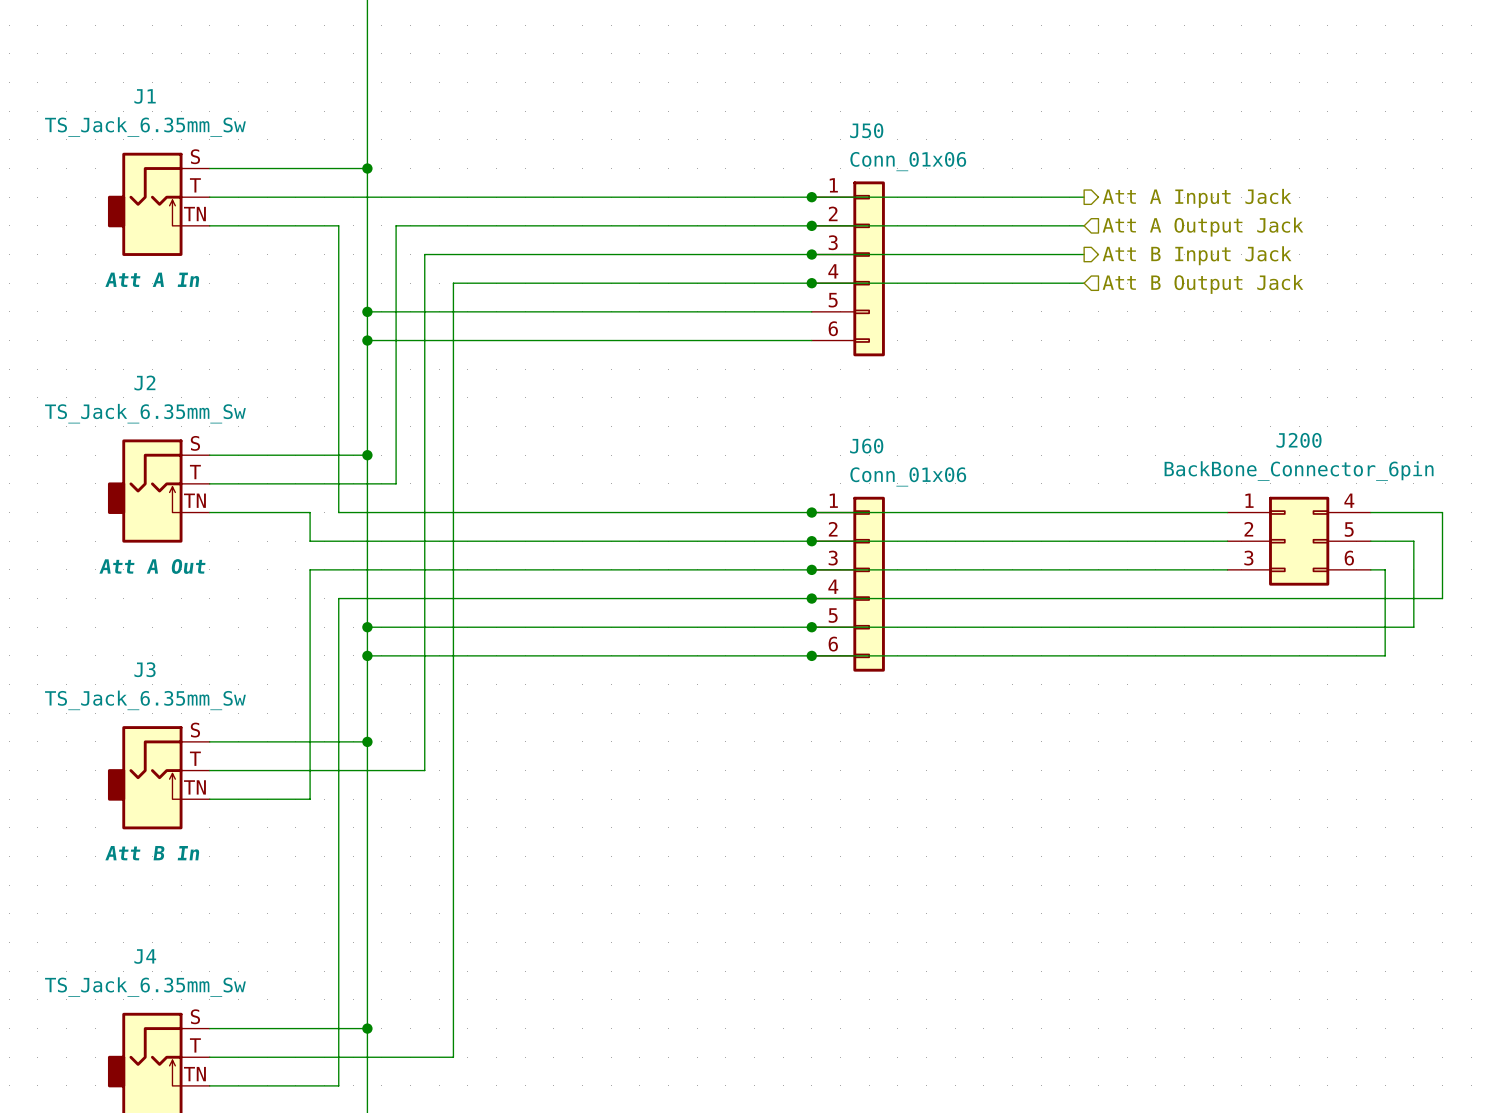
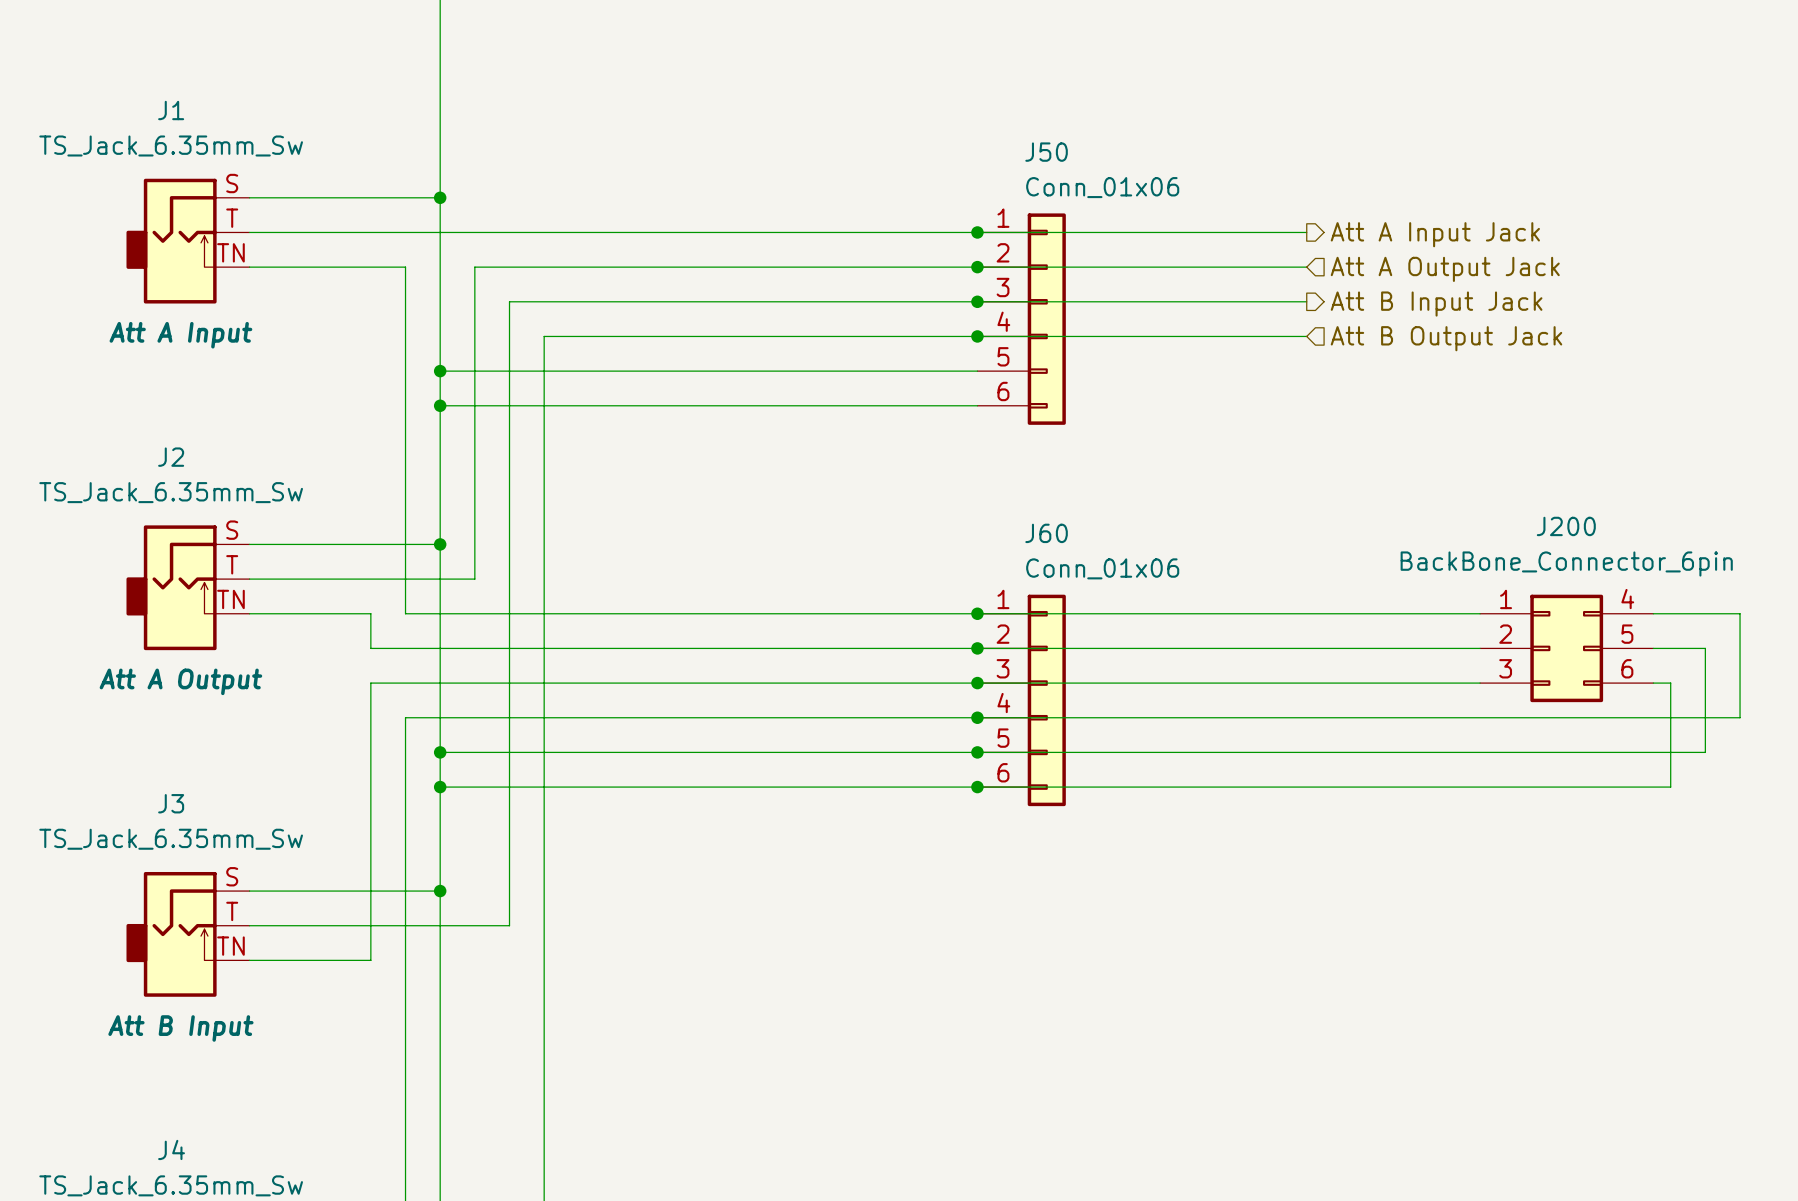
J1 text: Att A In (152, 279) -> Att A Input (180, 335)
J2 text: Att A Out (152, 566) -> Att A Output (180, 681)
J3 text: Att B In (152, 853) -> Att B Input (180, 1028)

